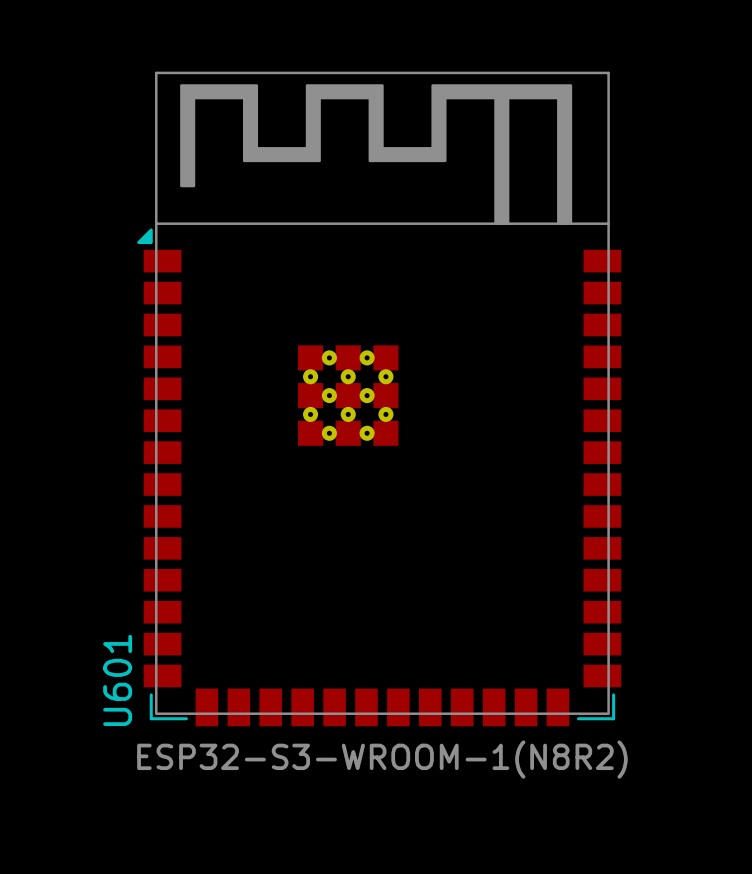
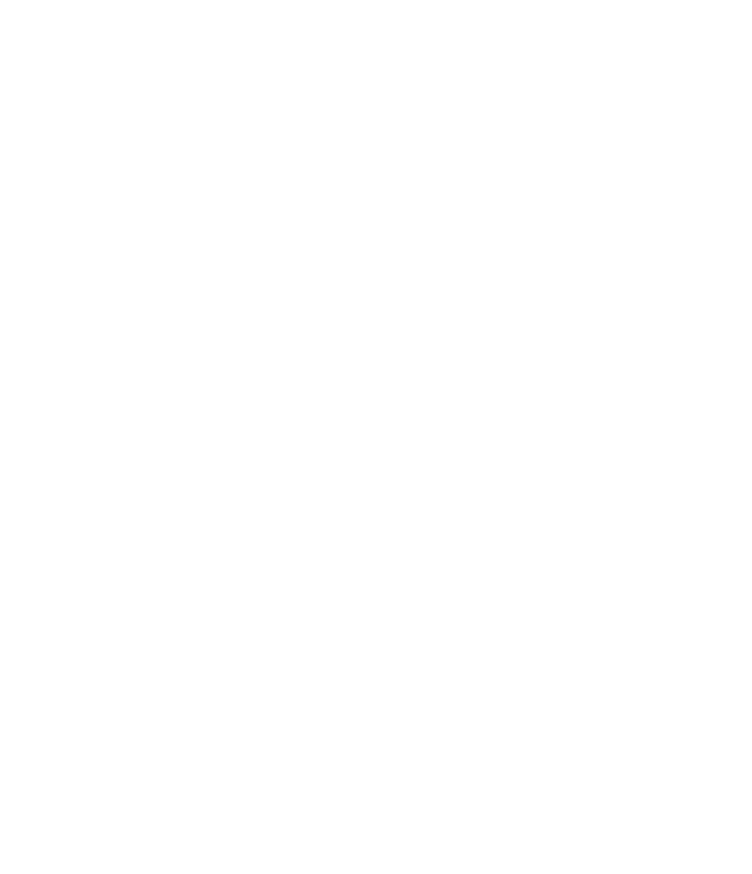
U601: ESP32-S3-WROOM-1(N8R2) (379, 398) -> none

